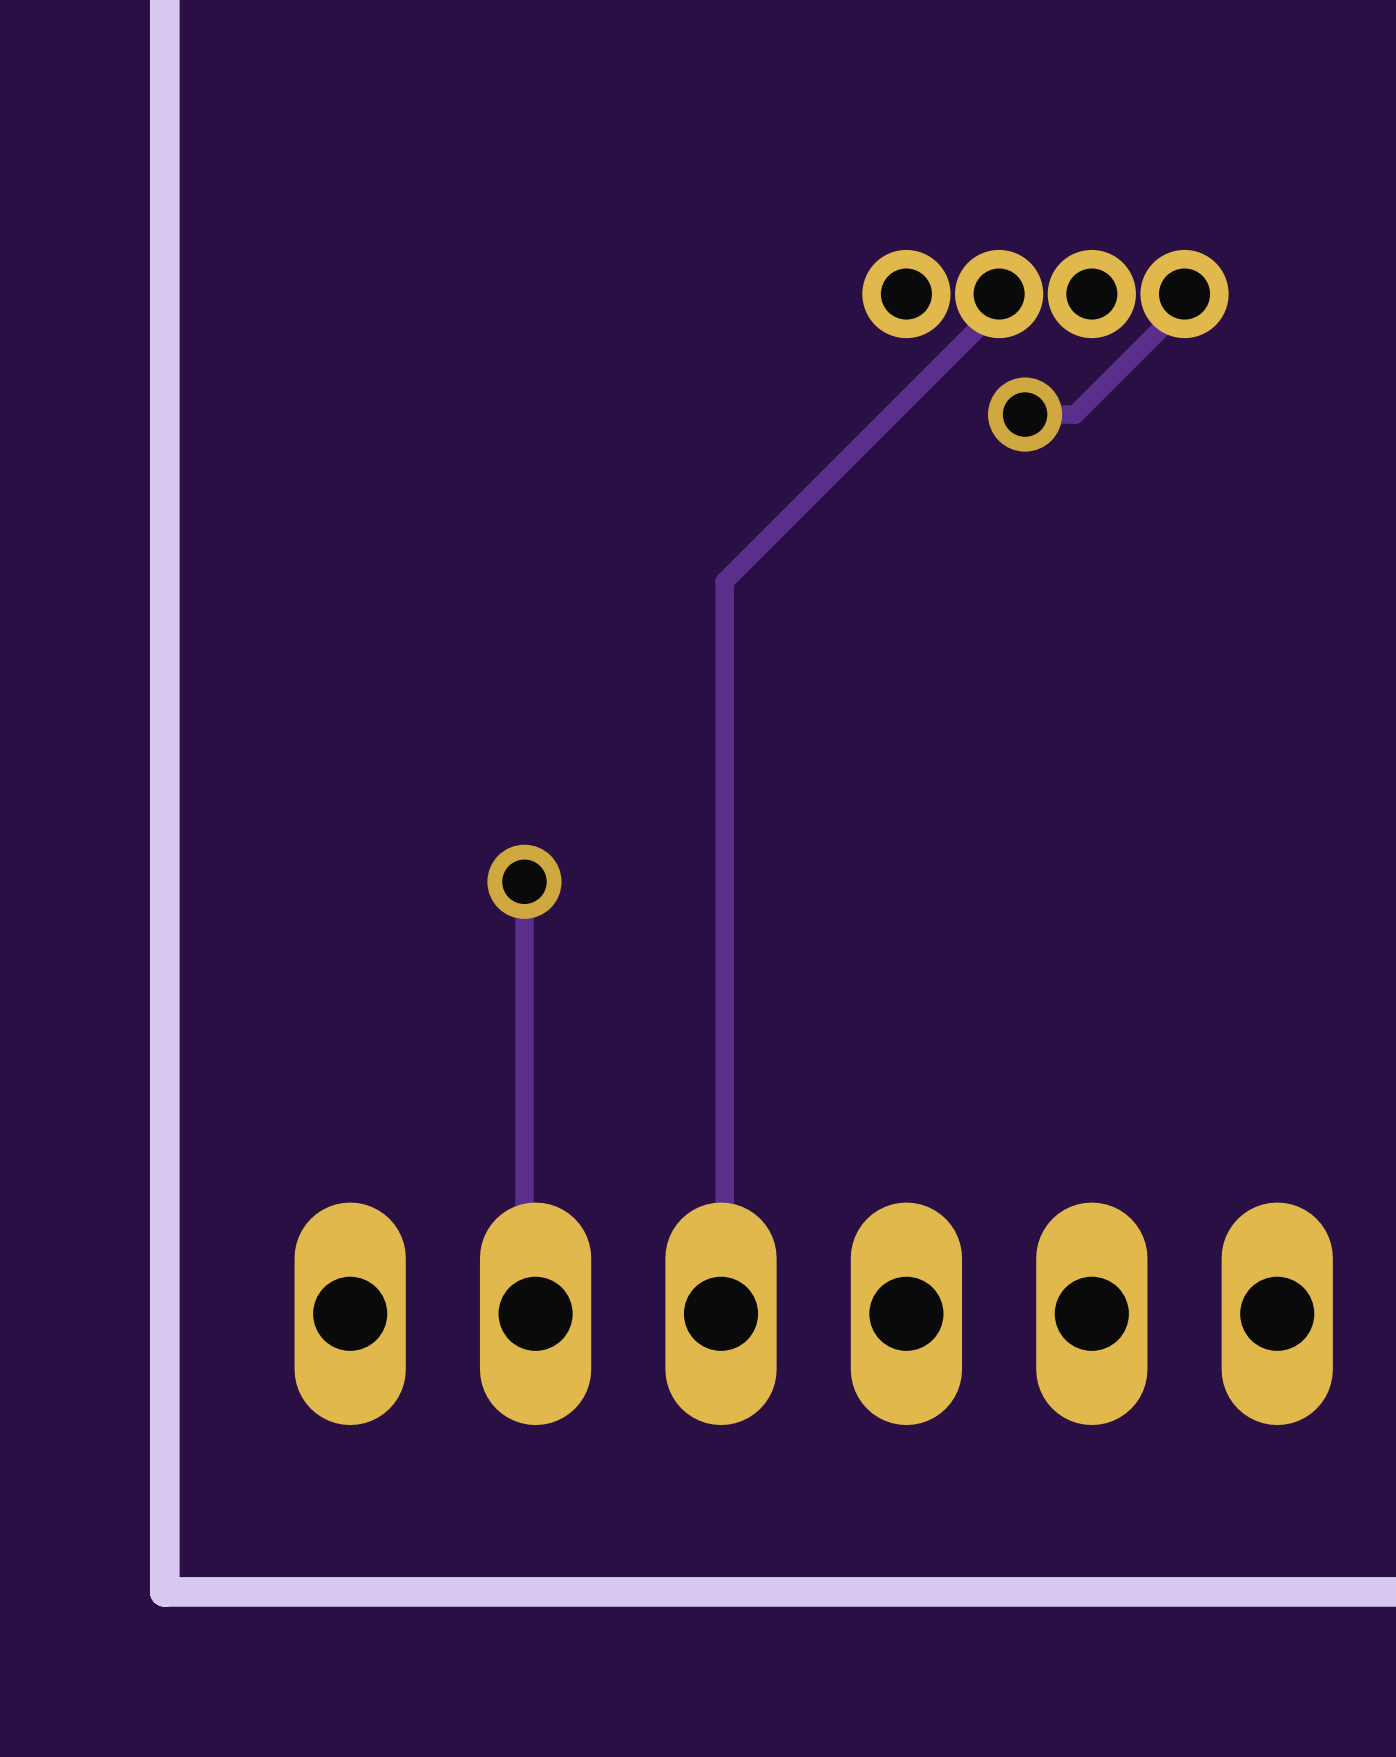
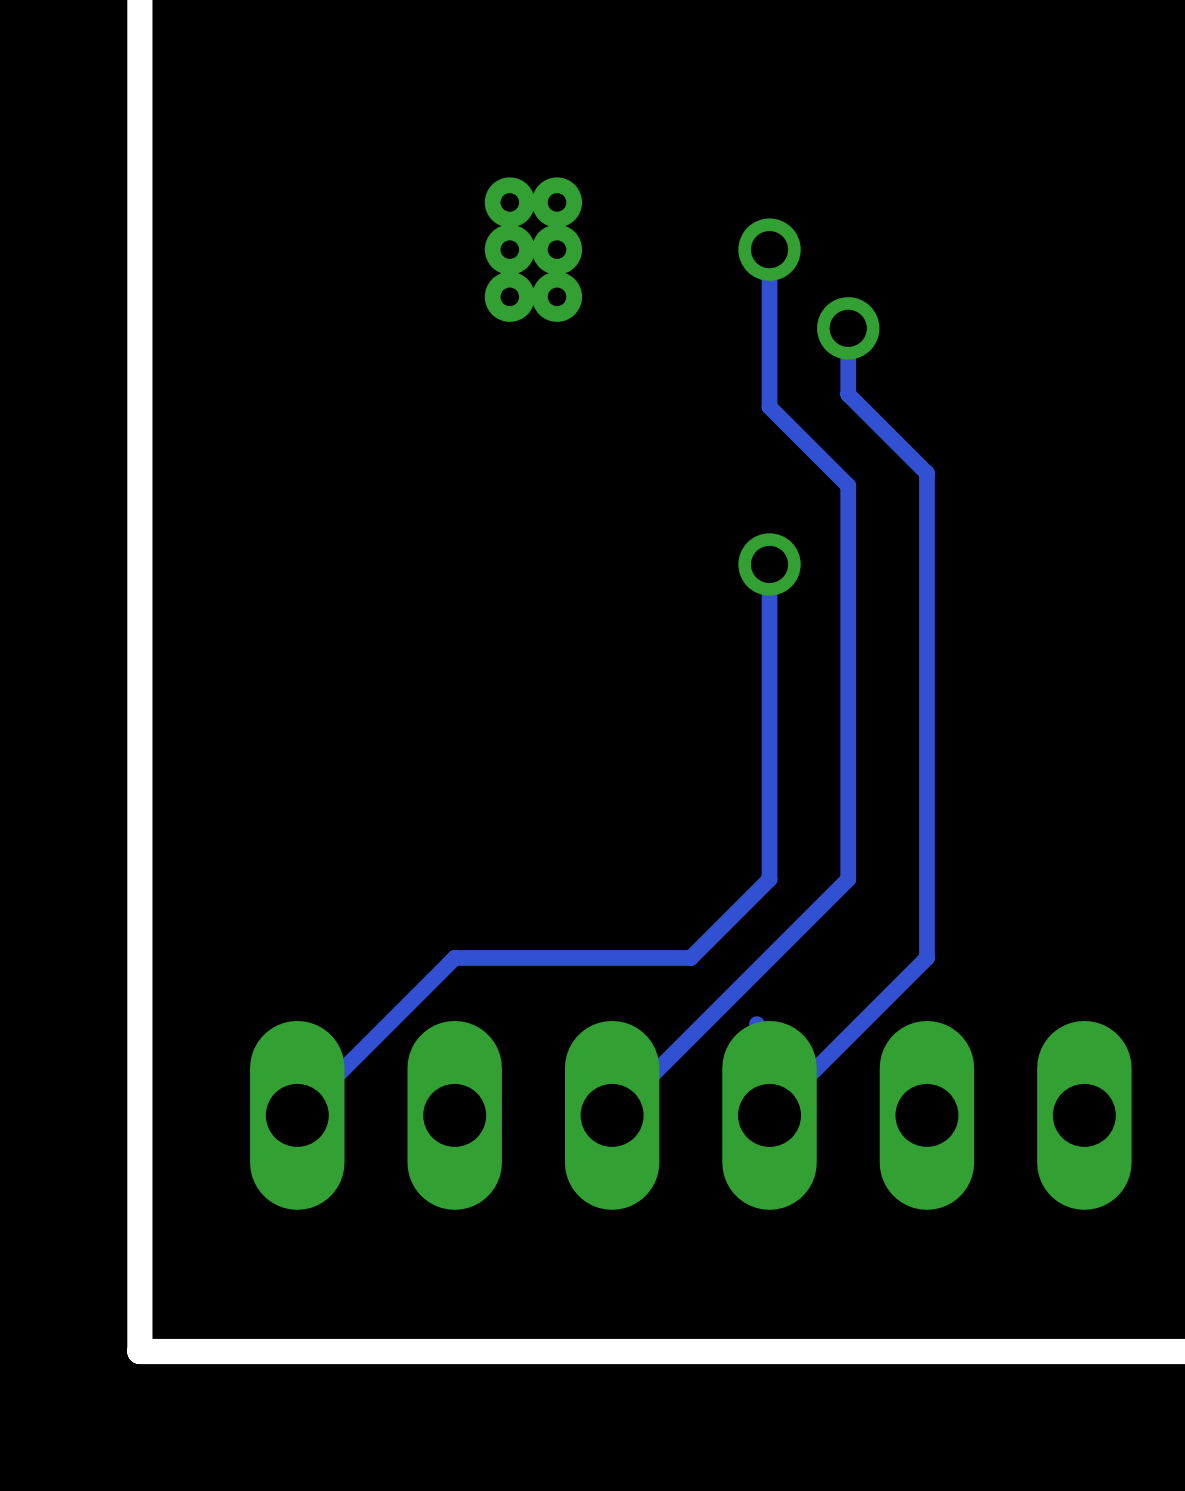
part: none -> (533, 249)
track: none -> (769, 249) (769, 407) (848, 485) (848, 879) (612, 1115)
via: none -> (769, 249)
track: (999, 294) (1008, 297) (724, 581) (724, 1298) -> none
part: (1045, 294) -> none
track: (1184, 294) (1191, 297) (1075, 414) (1025, 414) -> none
track: none -> (848, 328) (848, 394) (926, 473) (926, 957) (769, 1115) (756, 1024)
via position: (1025, 414) -> (848, 328)
track: none -> (769, 564) (769, 879) (690, 957) (454, 957) (297, 1115) (303, 1116)
via: none -> (769, 564)
track: (524, 881) (524, 1298) (535, 1313) -> none
via: (524, 881) -> none

